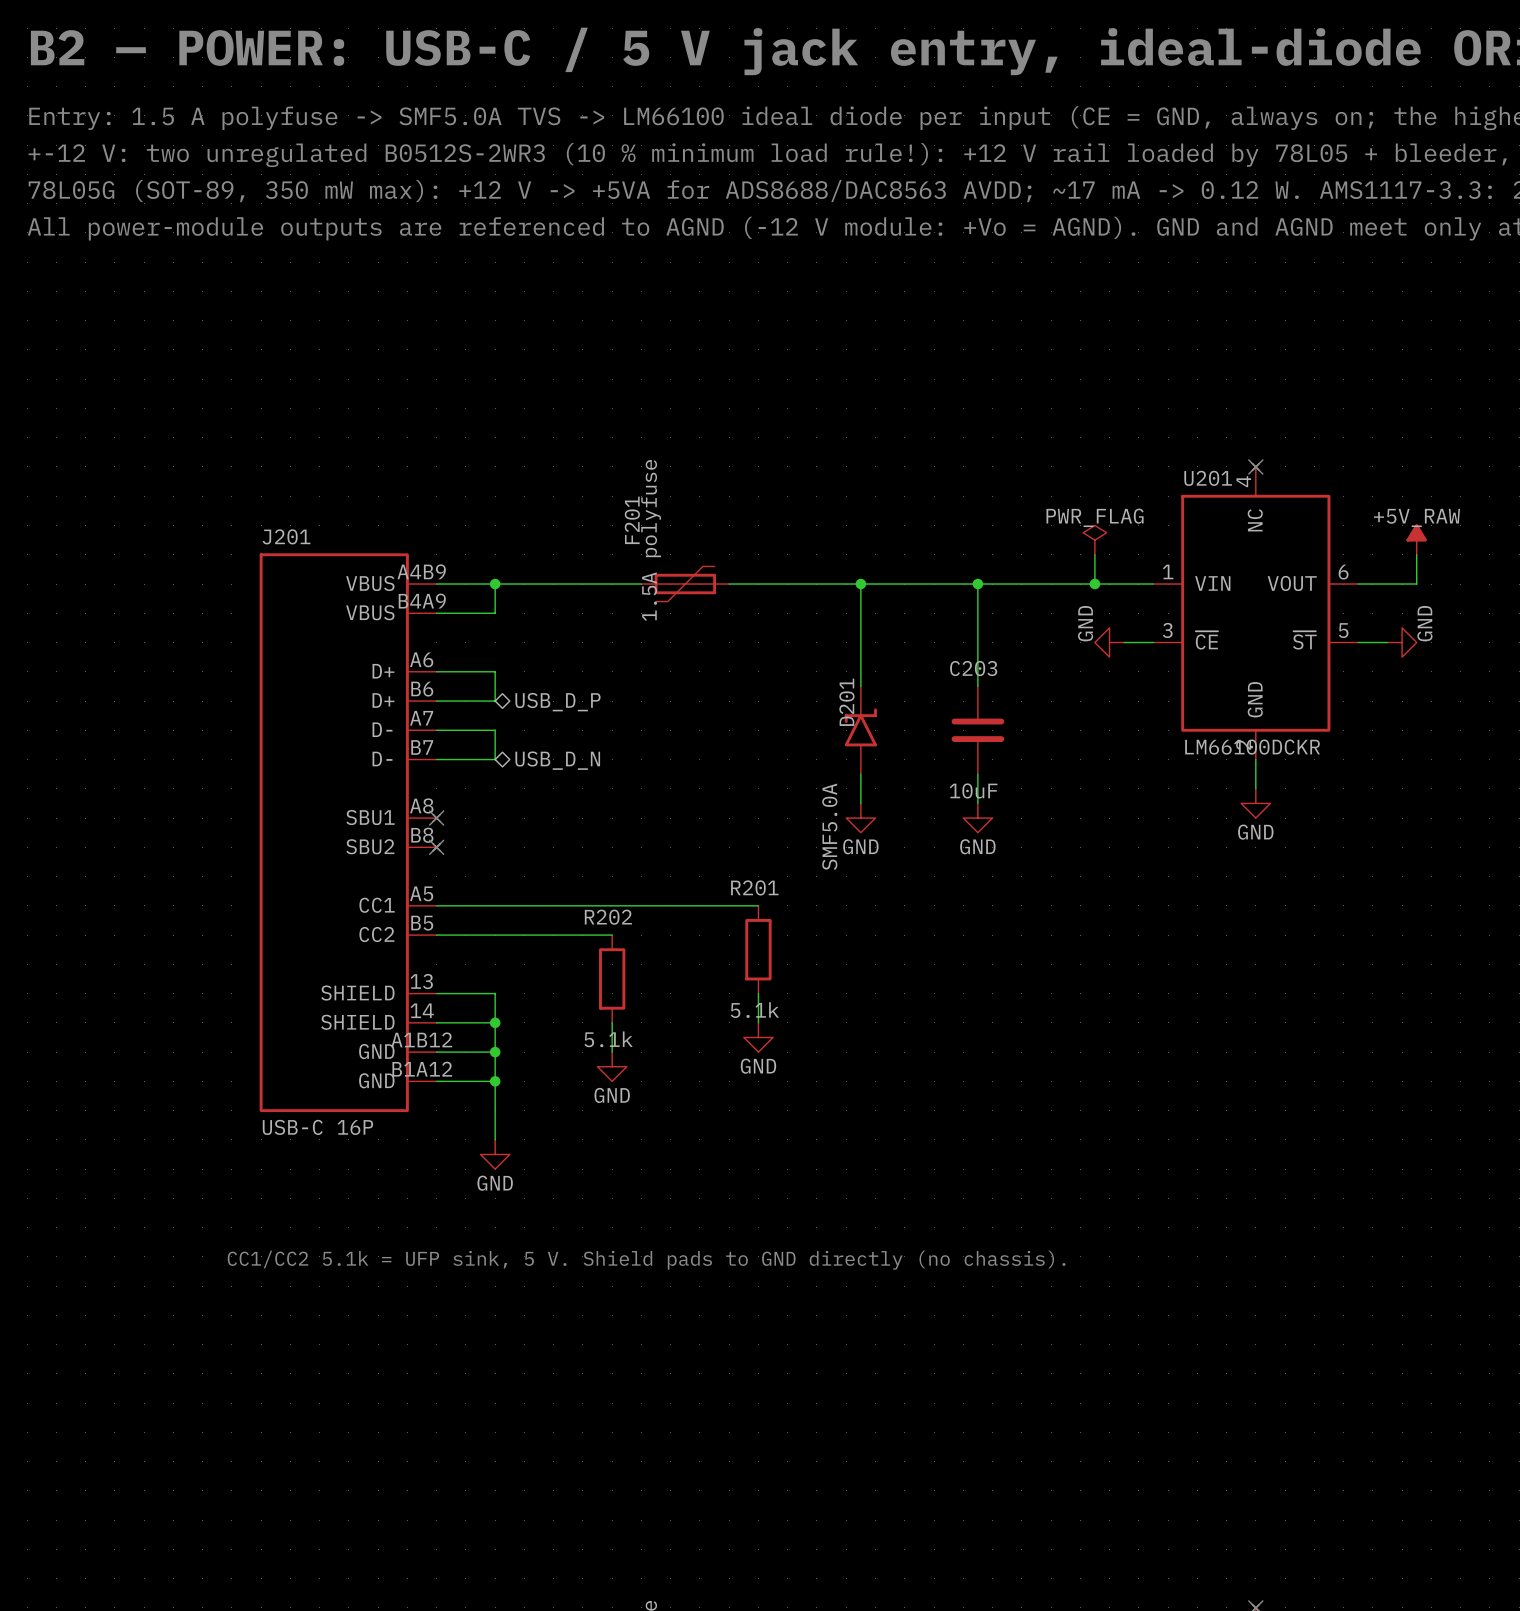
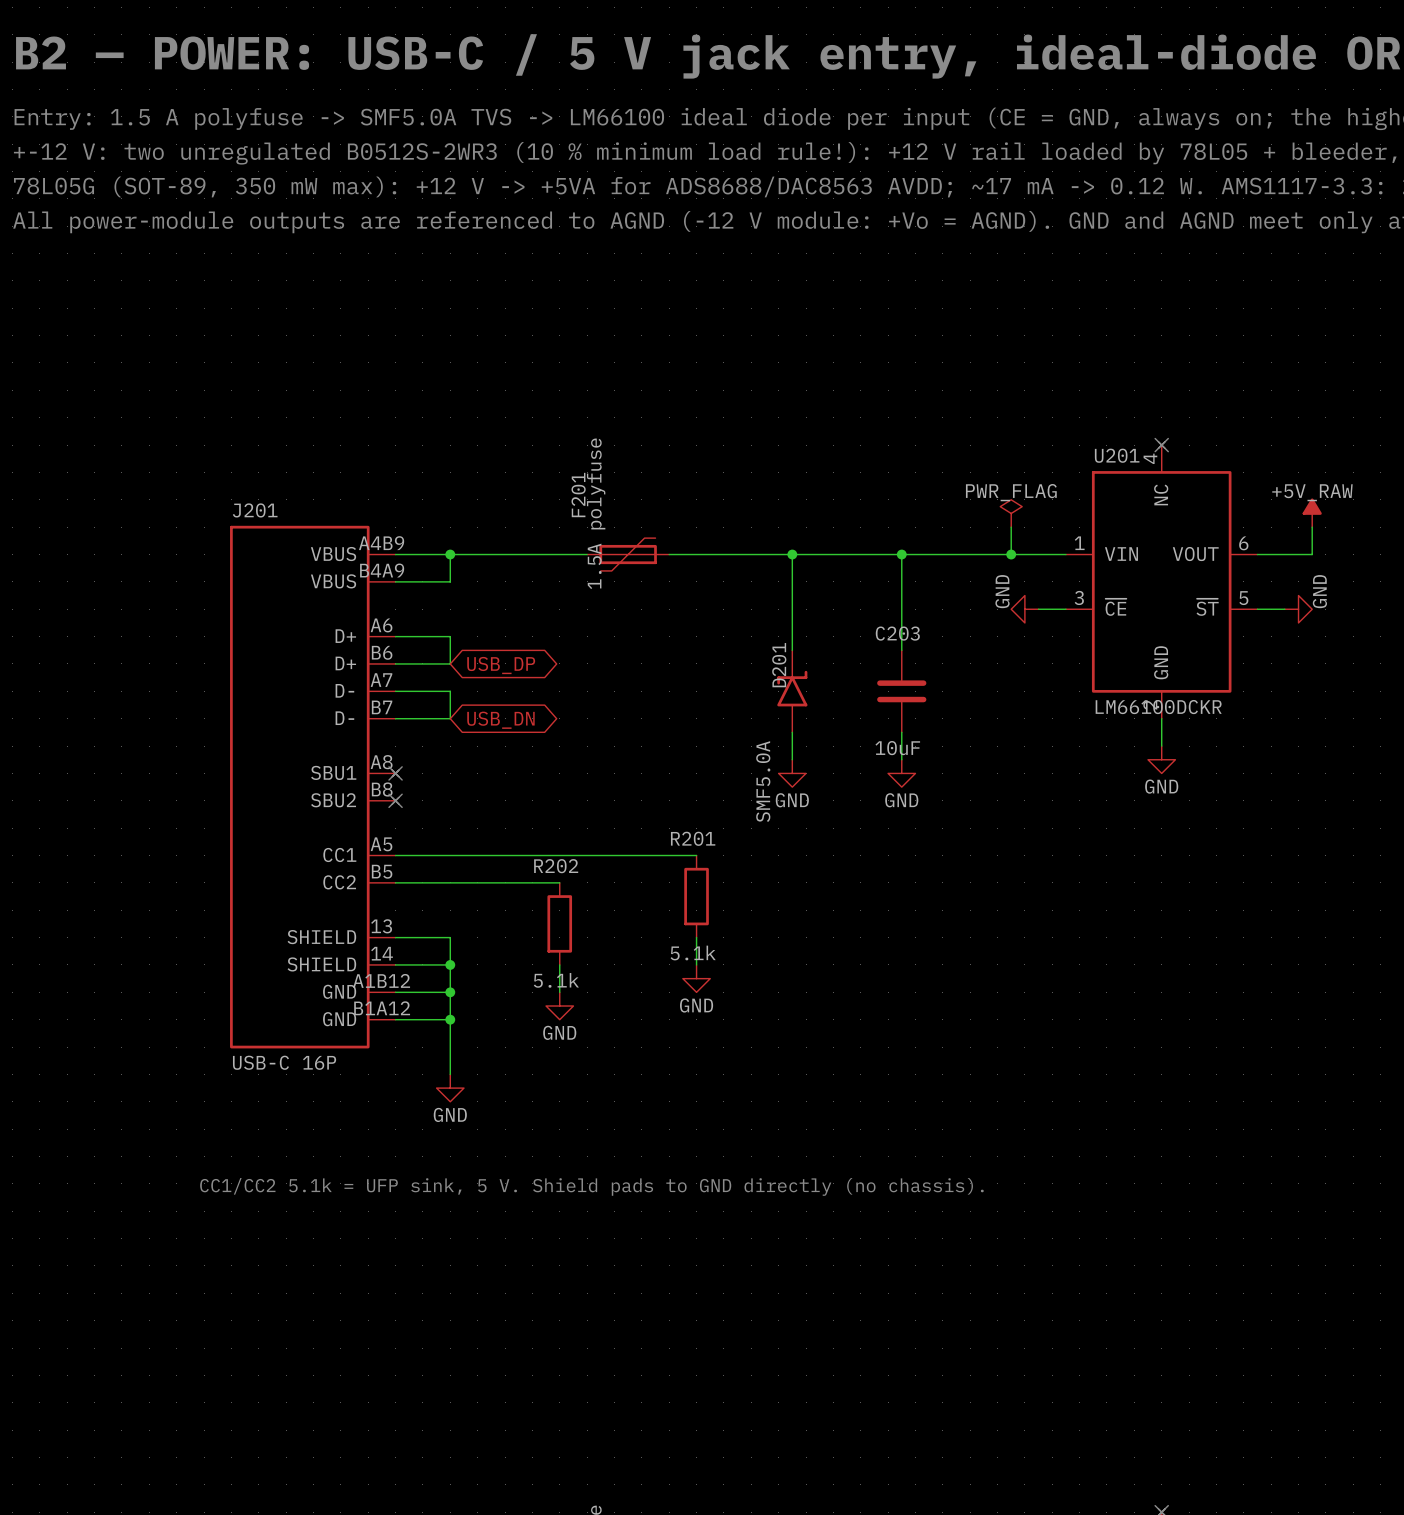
global label: none -> USB_DP (501, 665)
hierarchical label: USB_D_P (557, 702) -> none
hierarchical label: USB_D_N (557, 760) -> none
global label: none -> USB_DN (500, 720)

